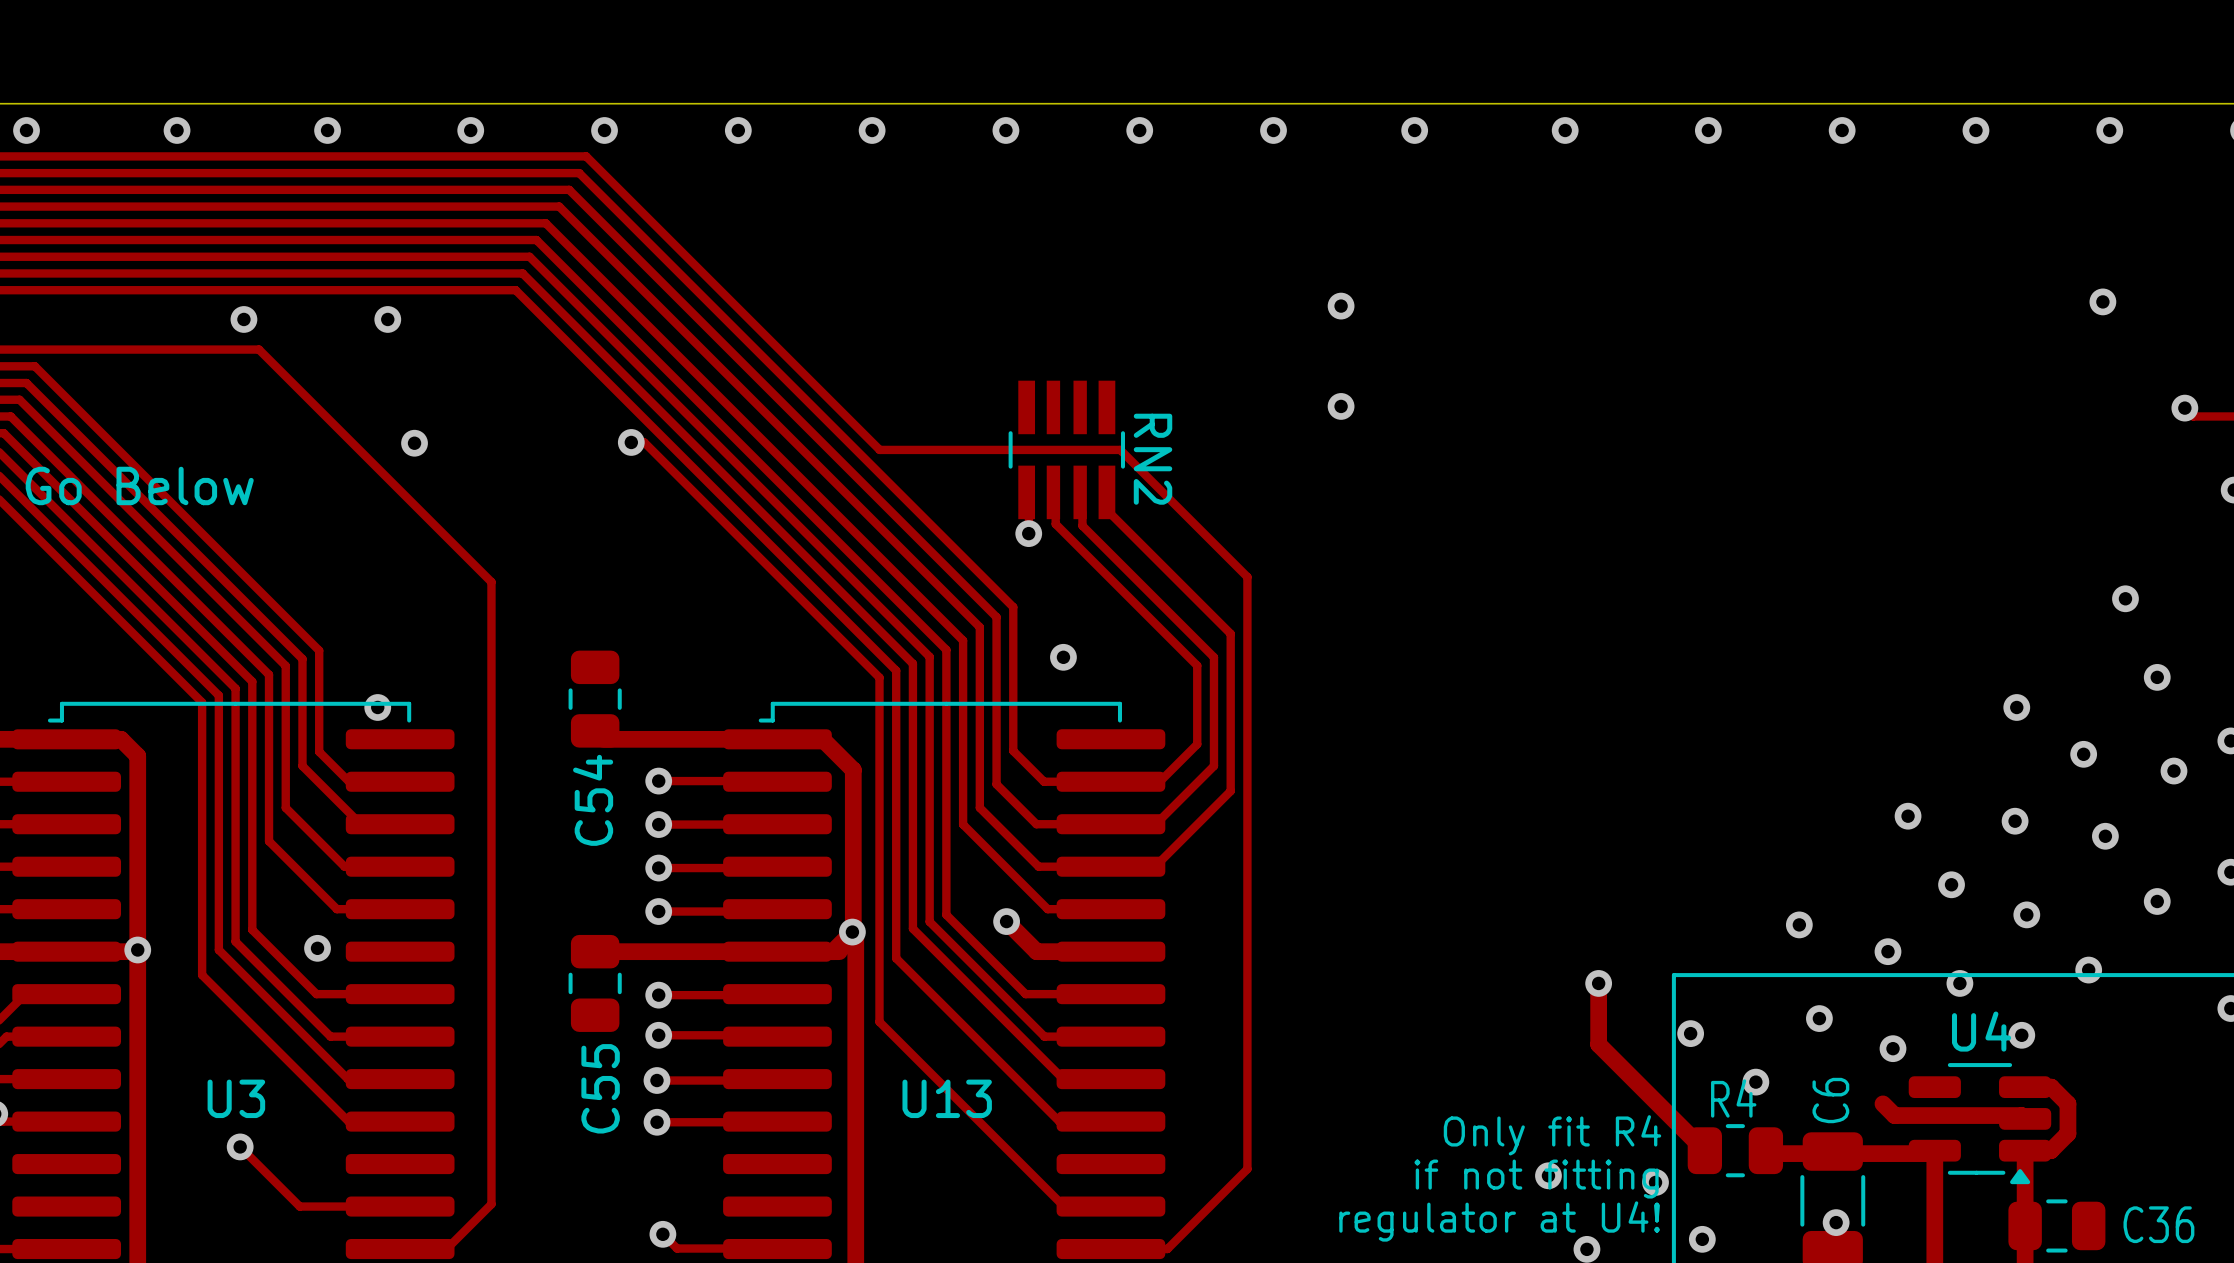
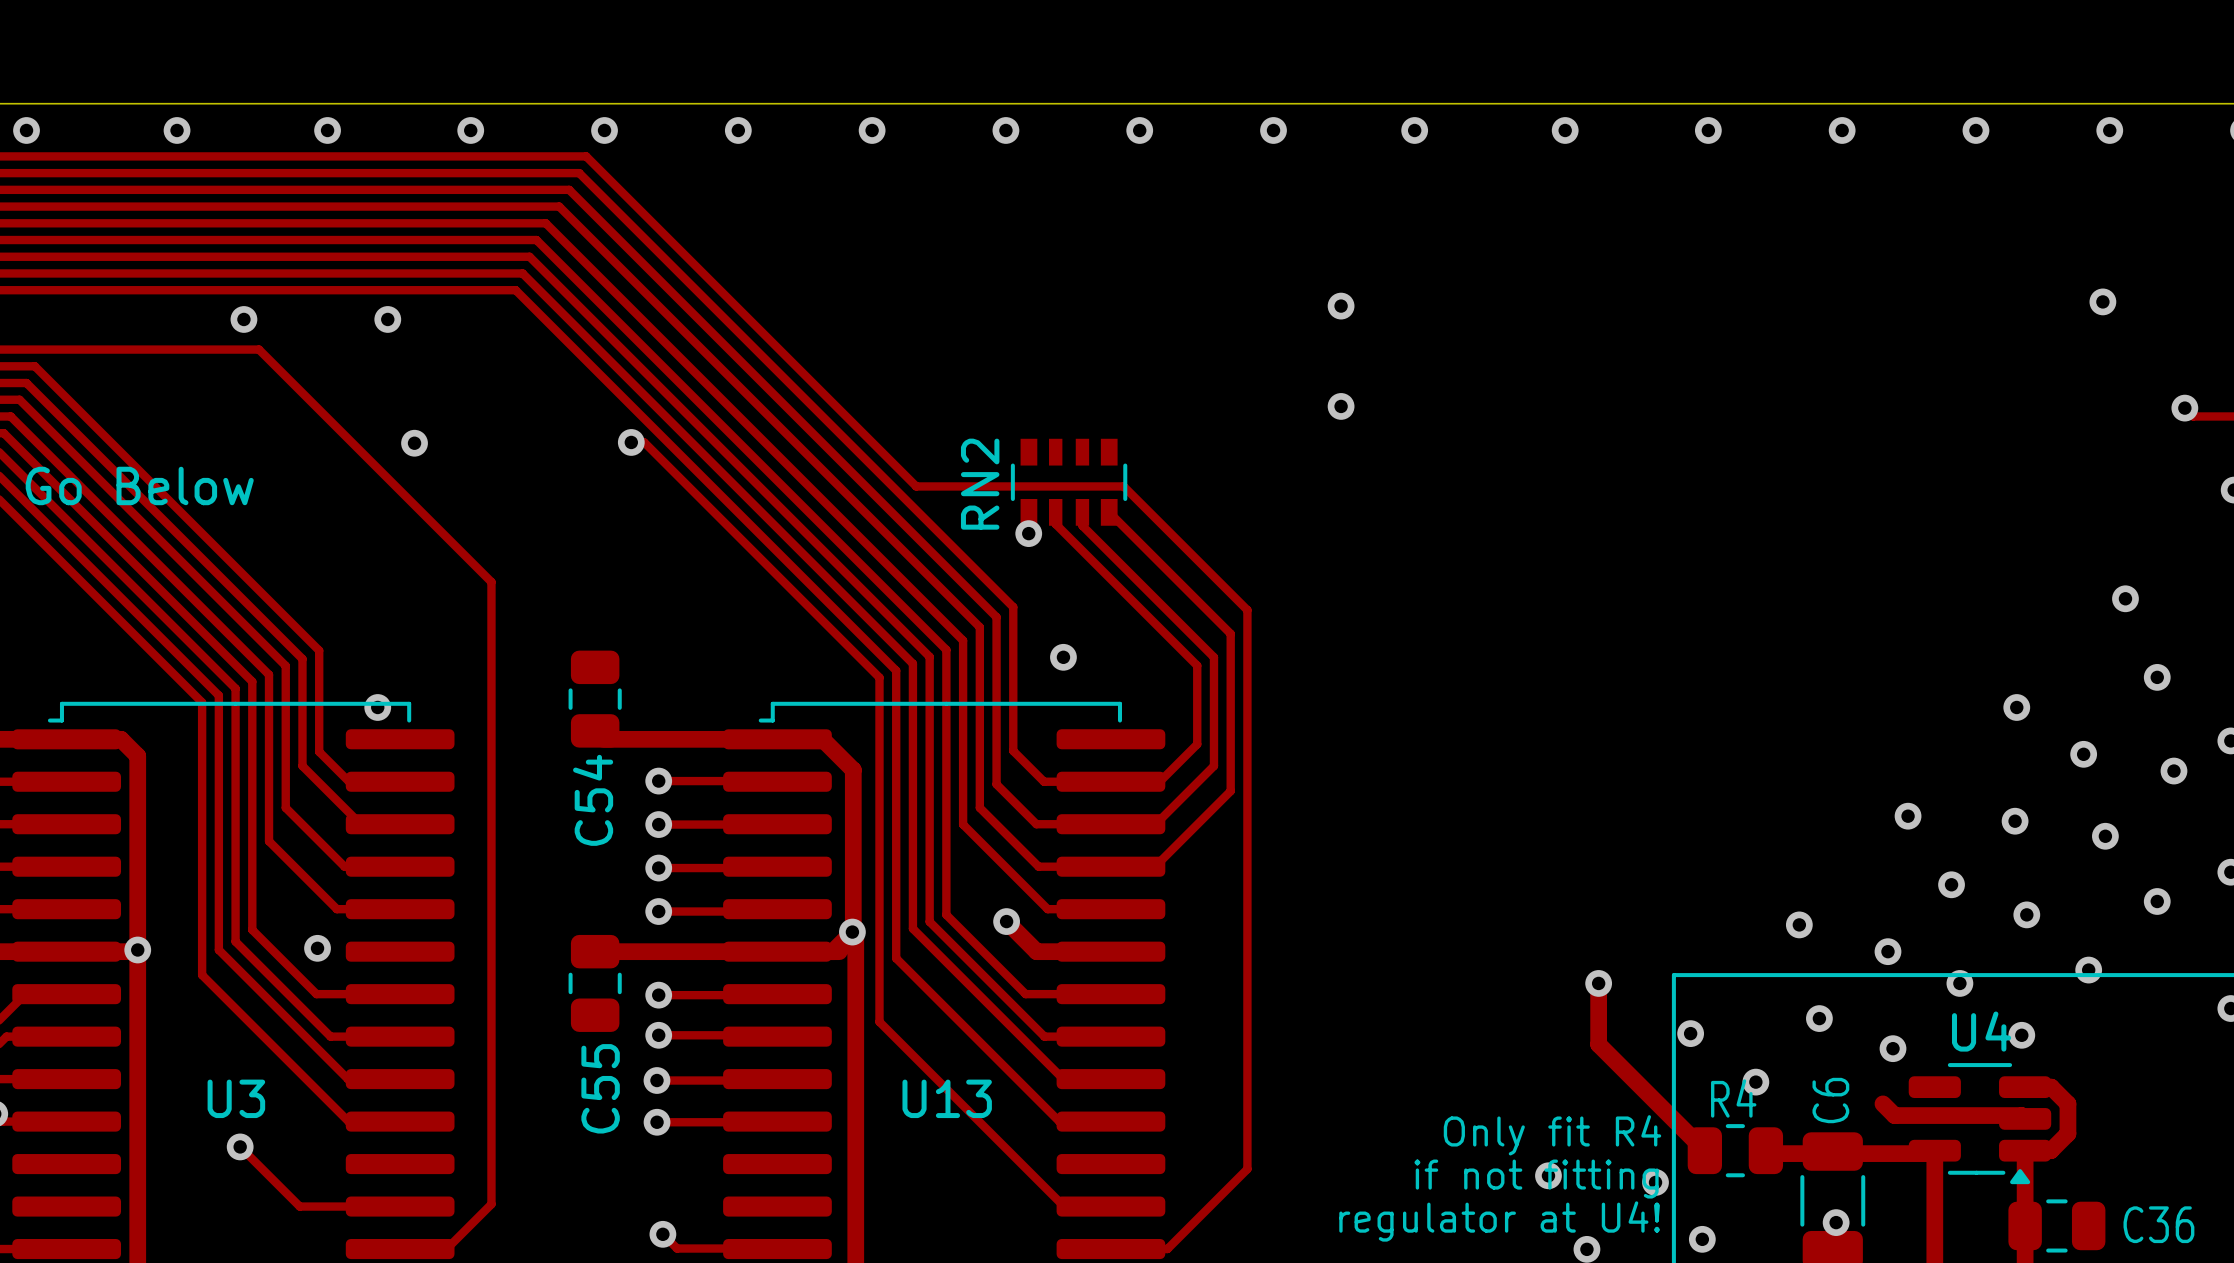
RN2 footprint: [1008, 380, 1126, 520] -> [1010, 438, 1128, 526]
track: (879, 449) (1120, 449) (1247, 577) (1247, 610) -> (879, 449) (916, 486) (1123, 486) (1247, 610)
RN2 name position: RN2 (1153, 459) -> RN2 (980, 484)

